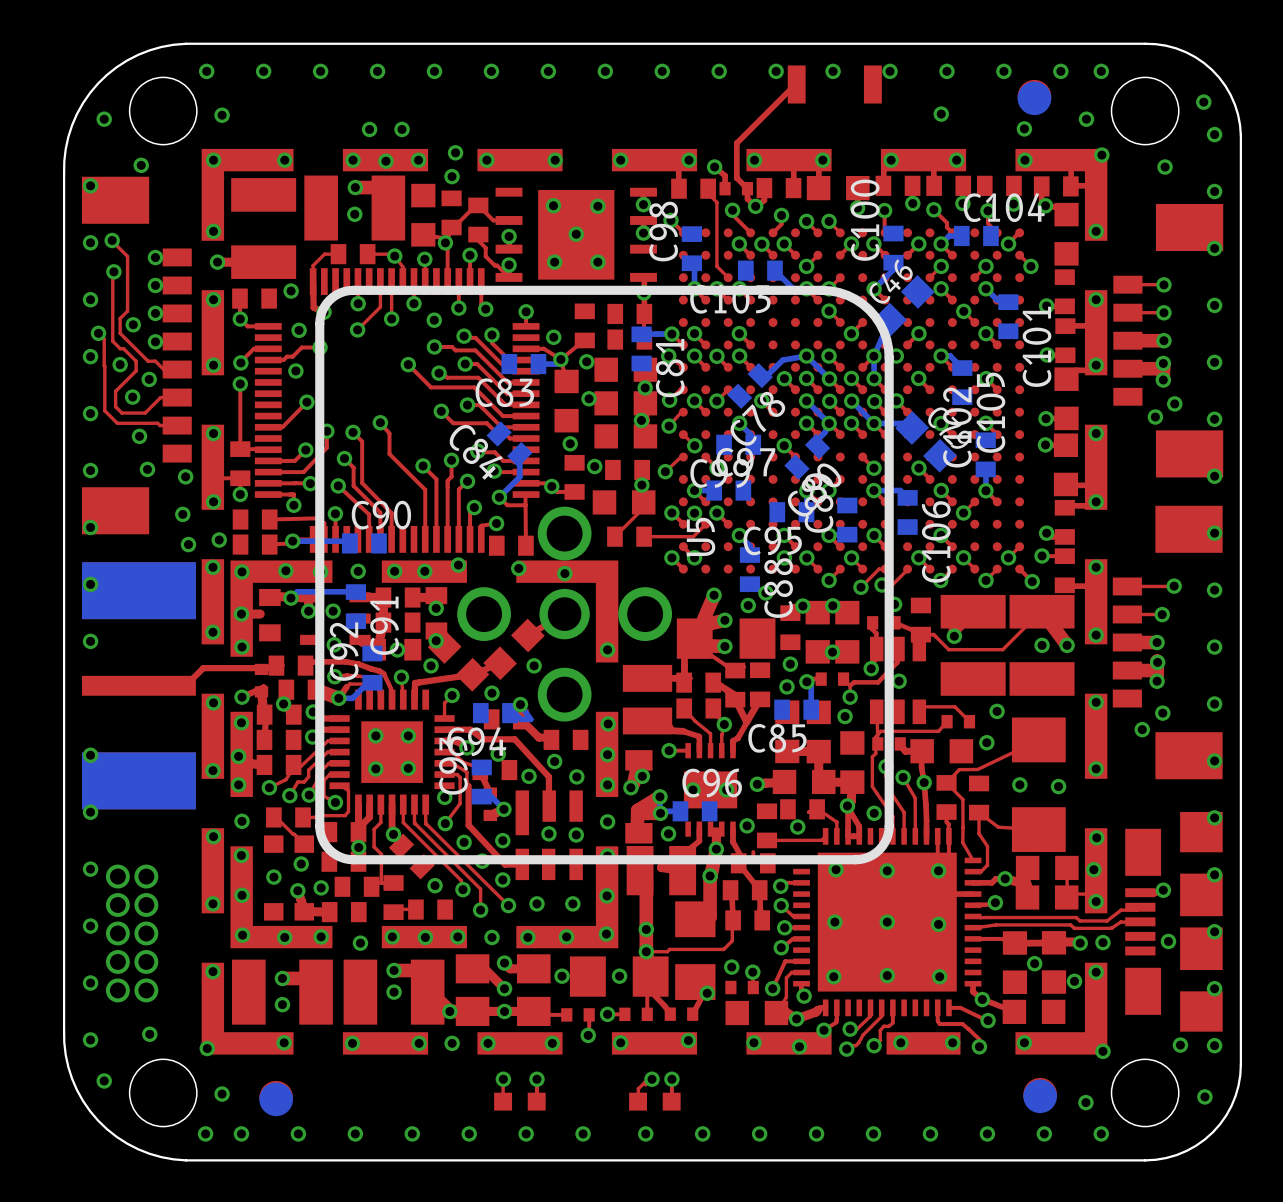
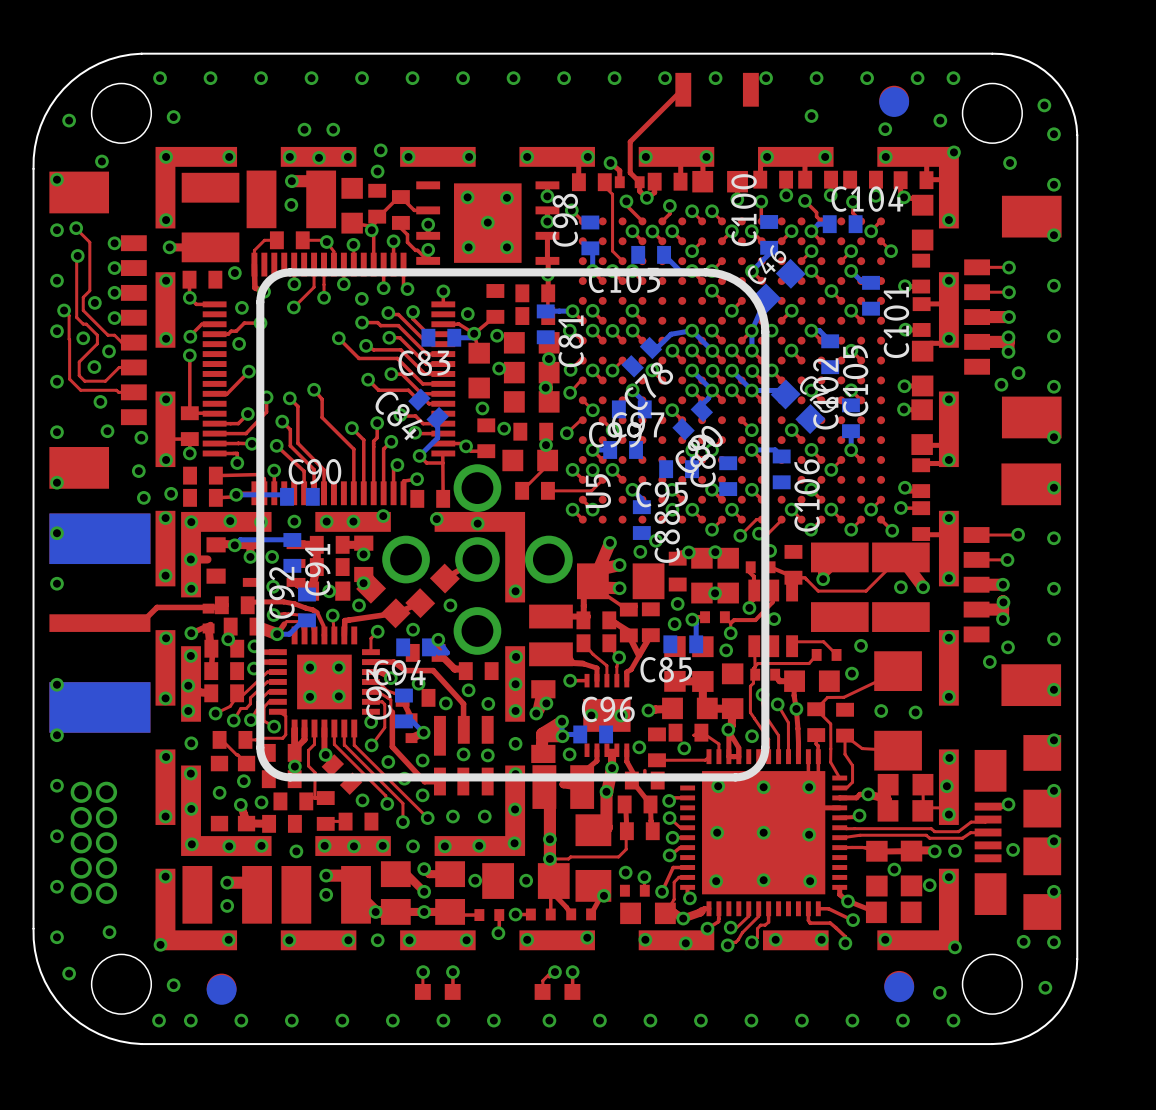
top track: none -> (547, 235) (548, 261)

